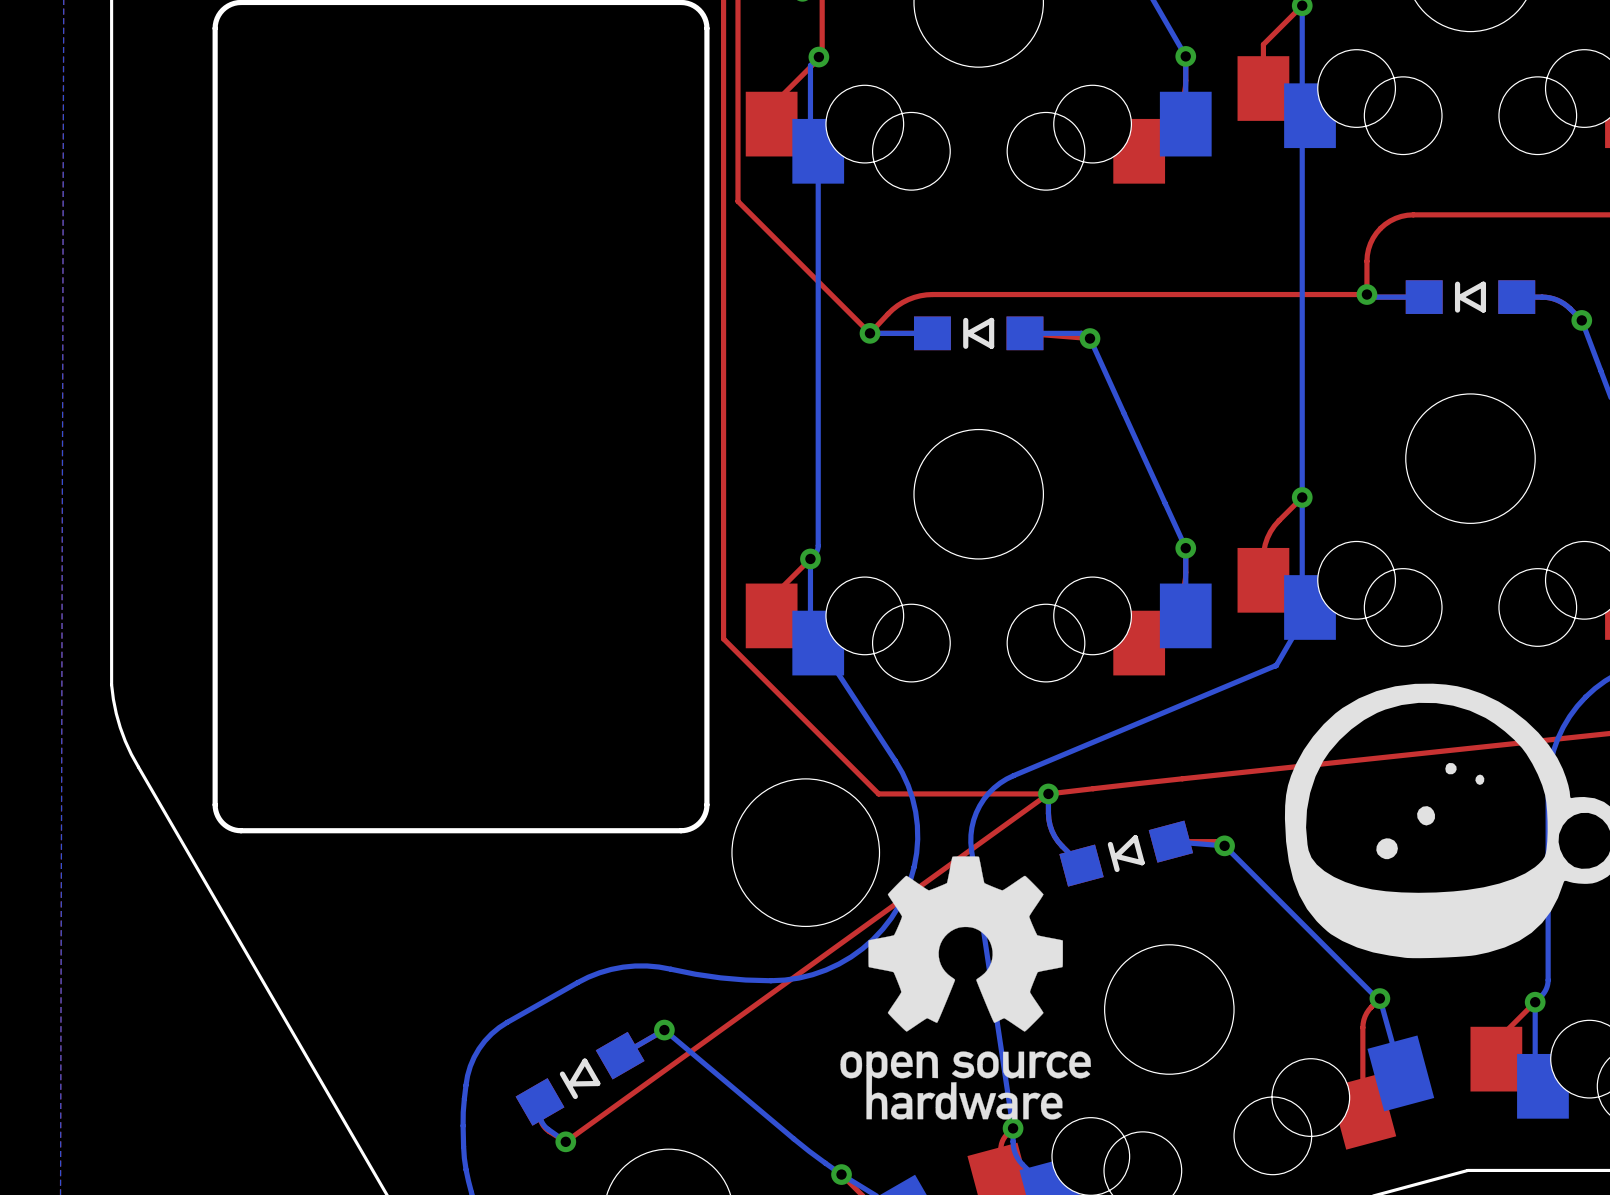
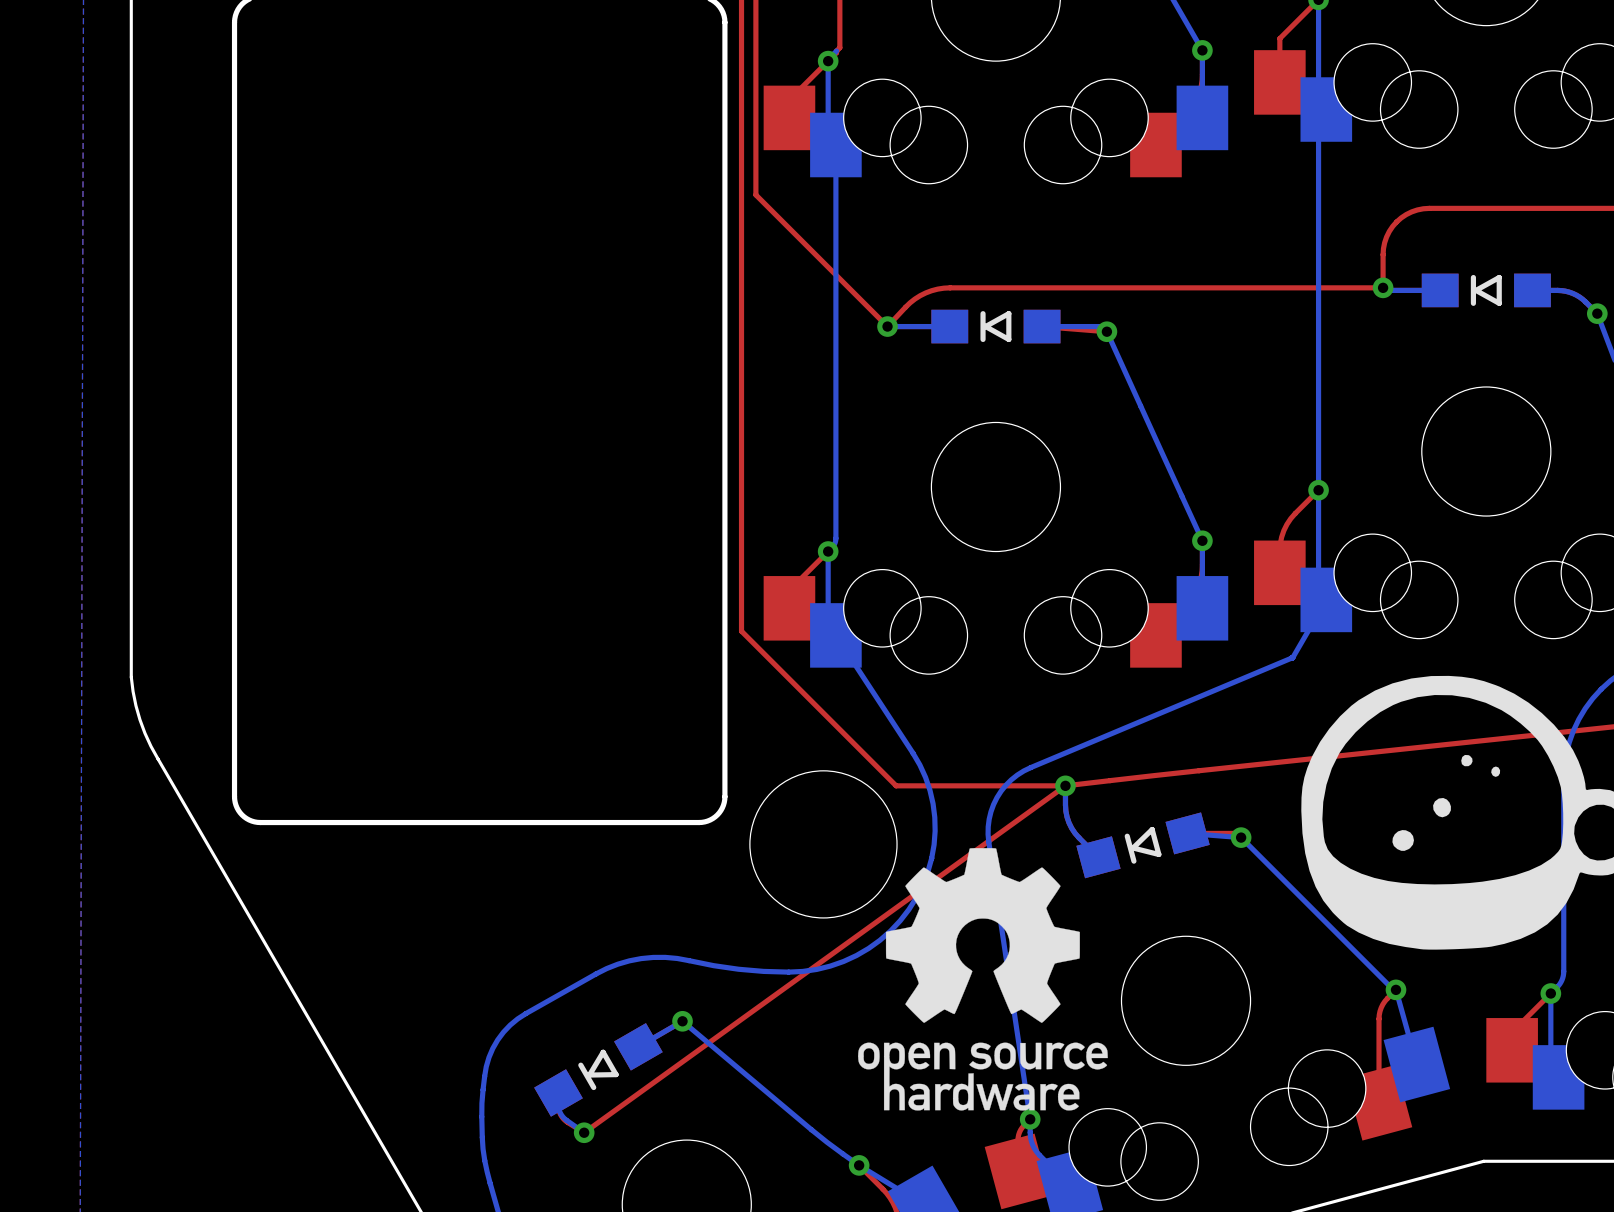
via position: (818, 57) -> (828, 61)

